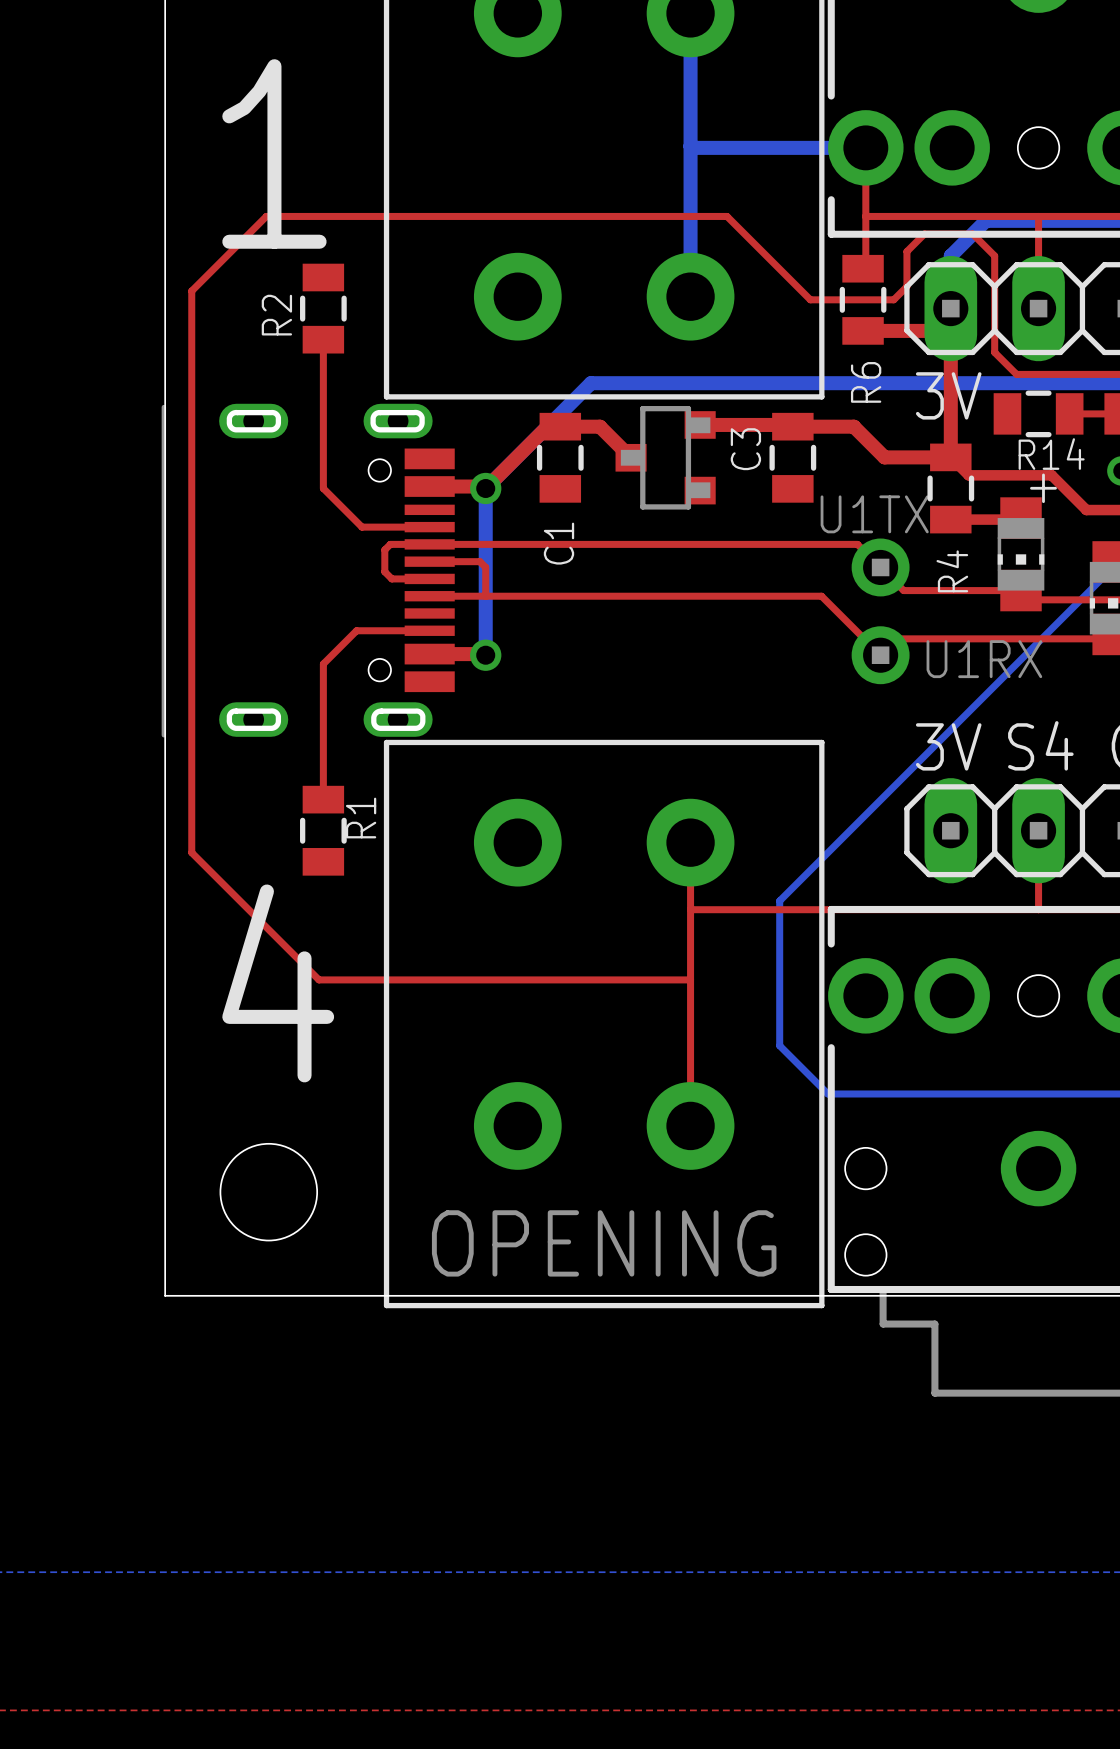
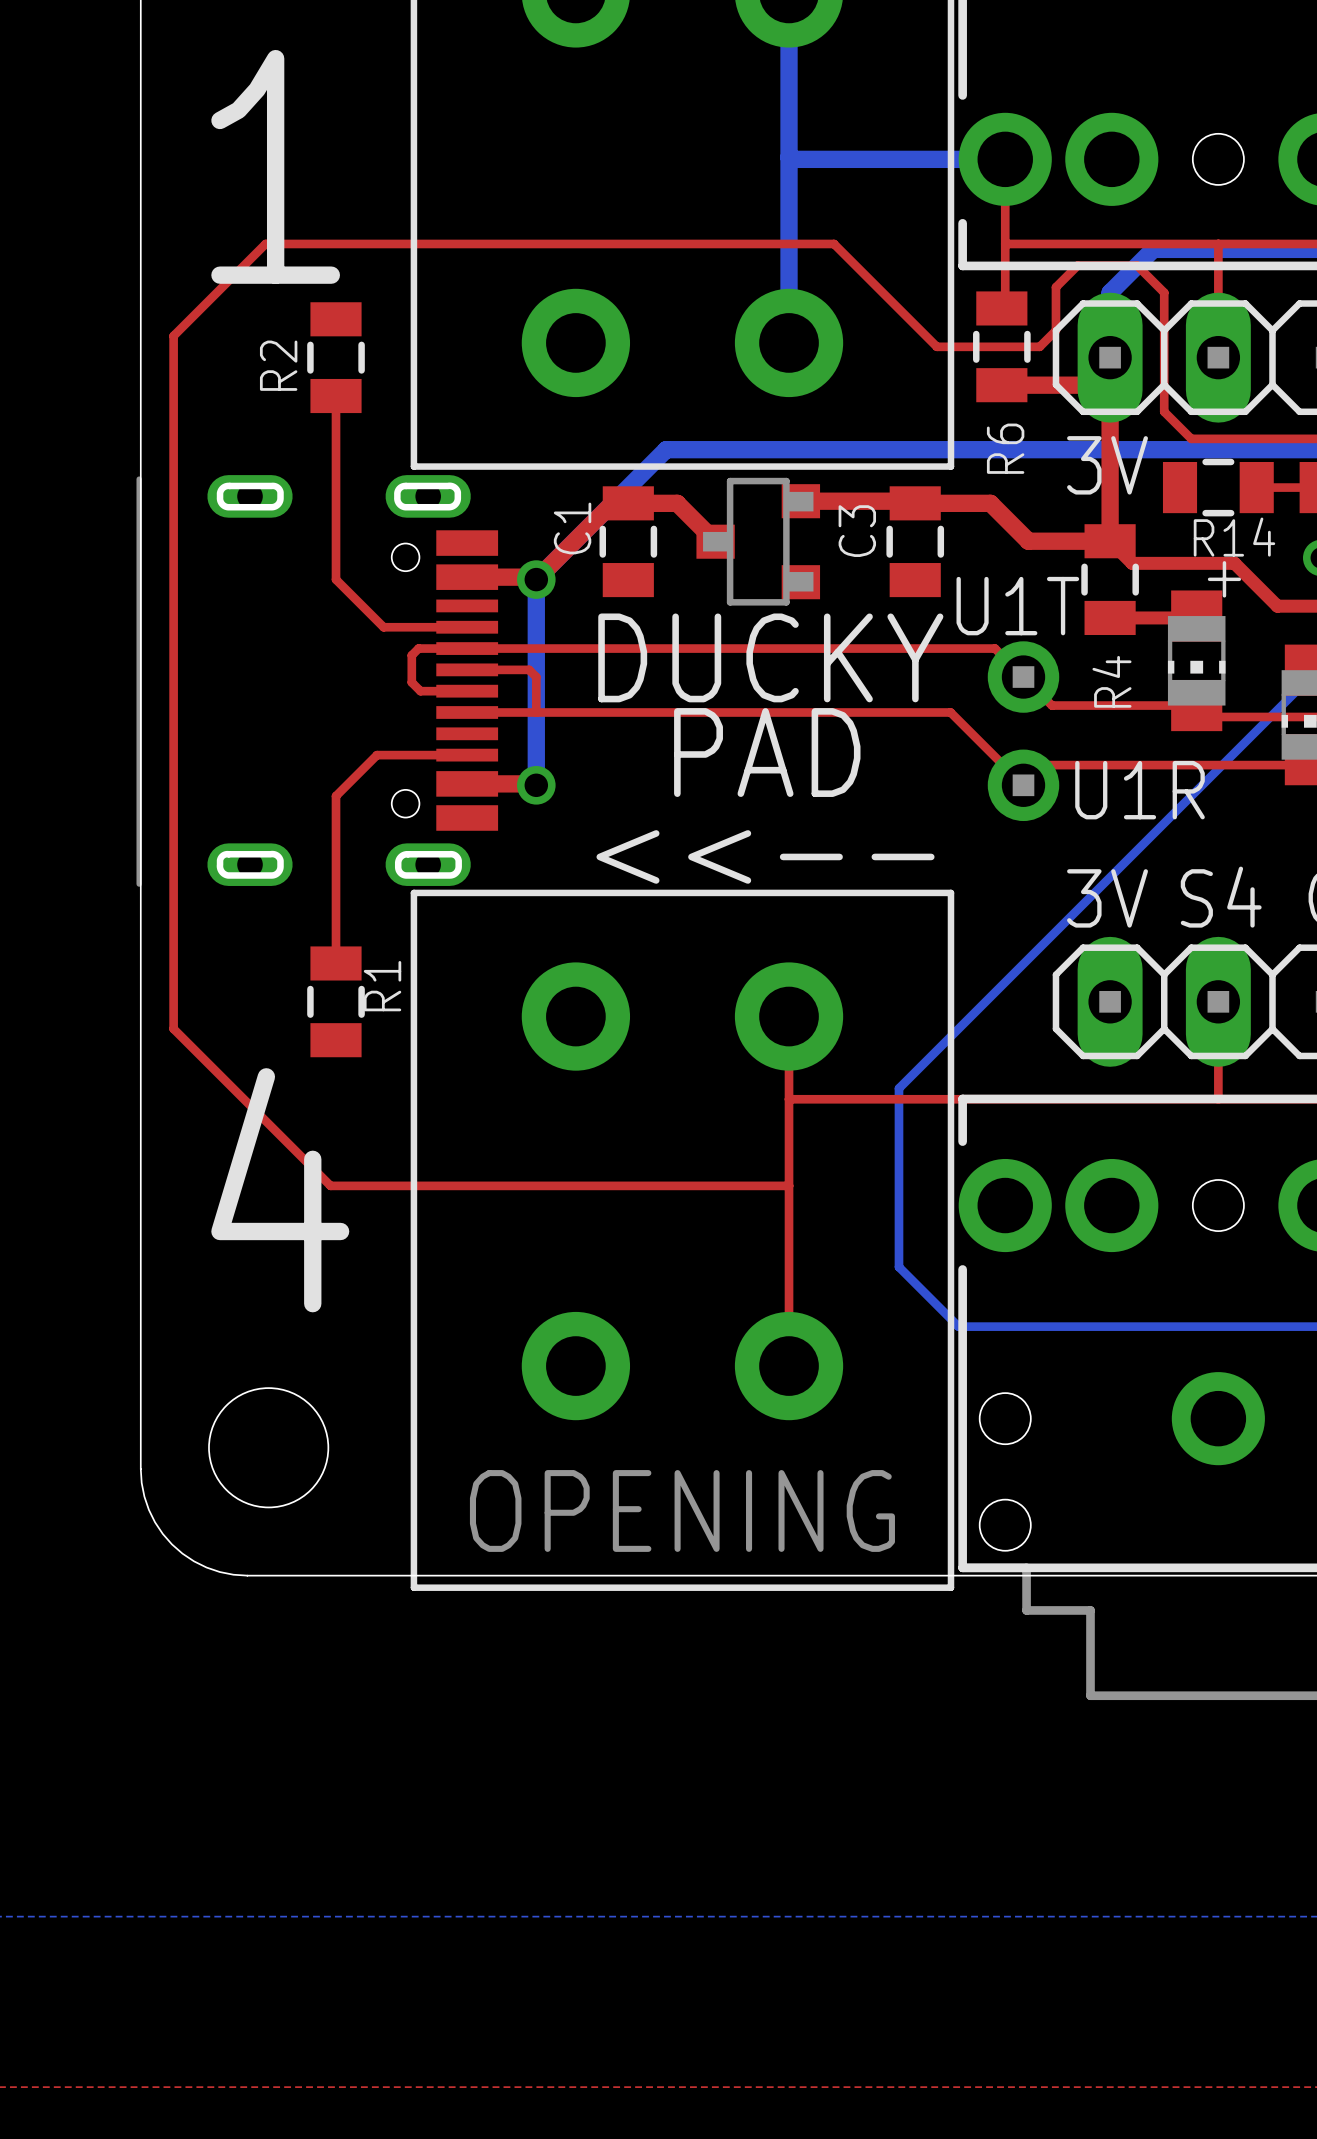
text: U1TX (874, 514) -> U1T (1017, 606)
C1 name position: C1 (558, 543) -> C1 (572, 528)
text: none -> DUCKY (770, 657)
text: none -> PAD (767, 752)
text: U1RX (984, 659) -> U1R (1140, 790)
text: none -> <<-- (765, 856)
board edge: (165, 1209) (165, 1295) (251, 1295) -> (140, 1469) (141, 1482) (148, 1509) (155, 1522) (172, 1544) (194, 1561) (206, 1567) (233, 1574) (247, 1575)

